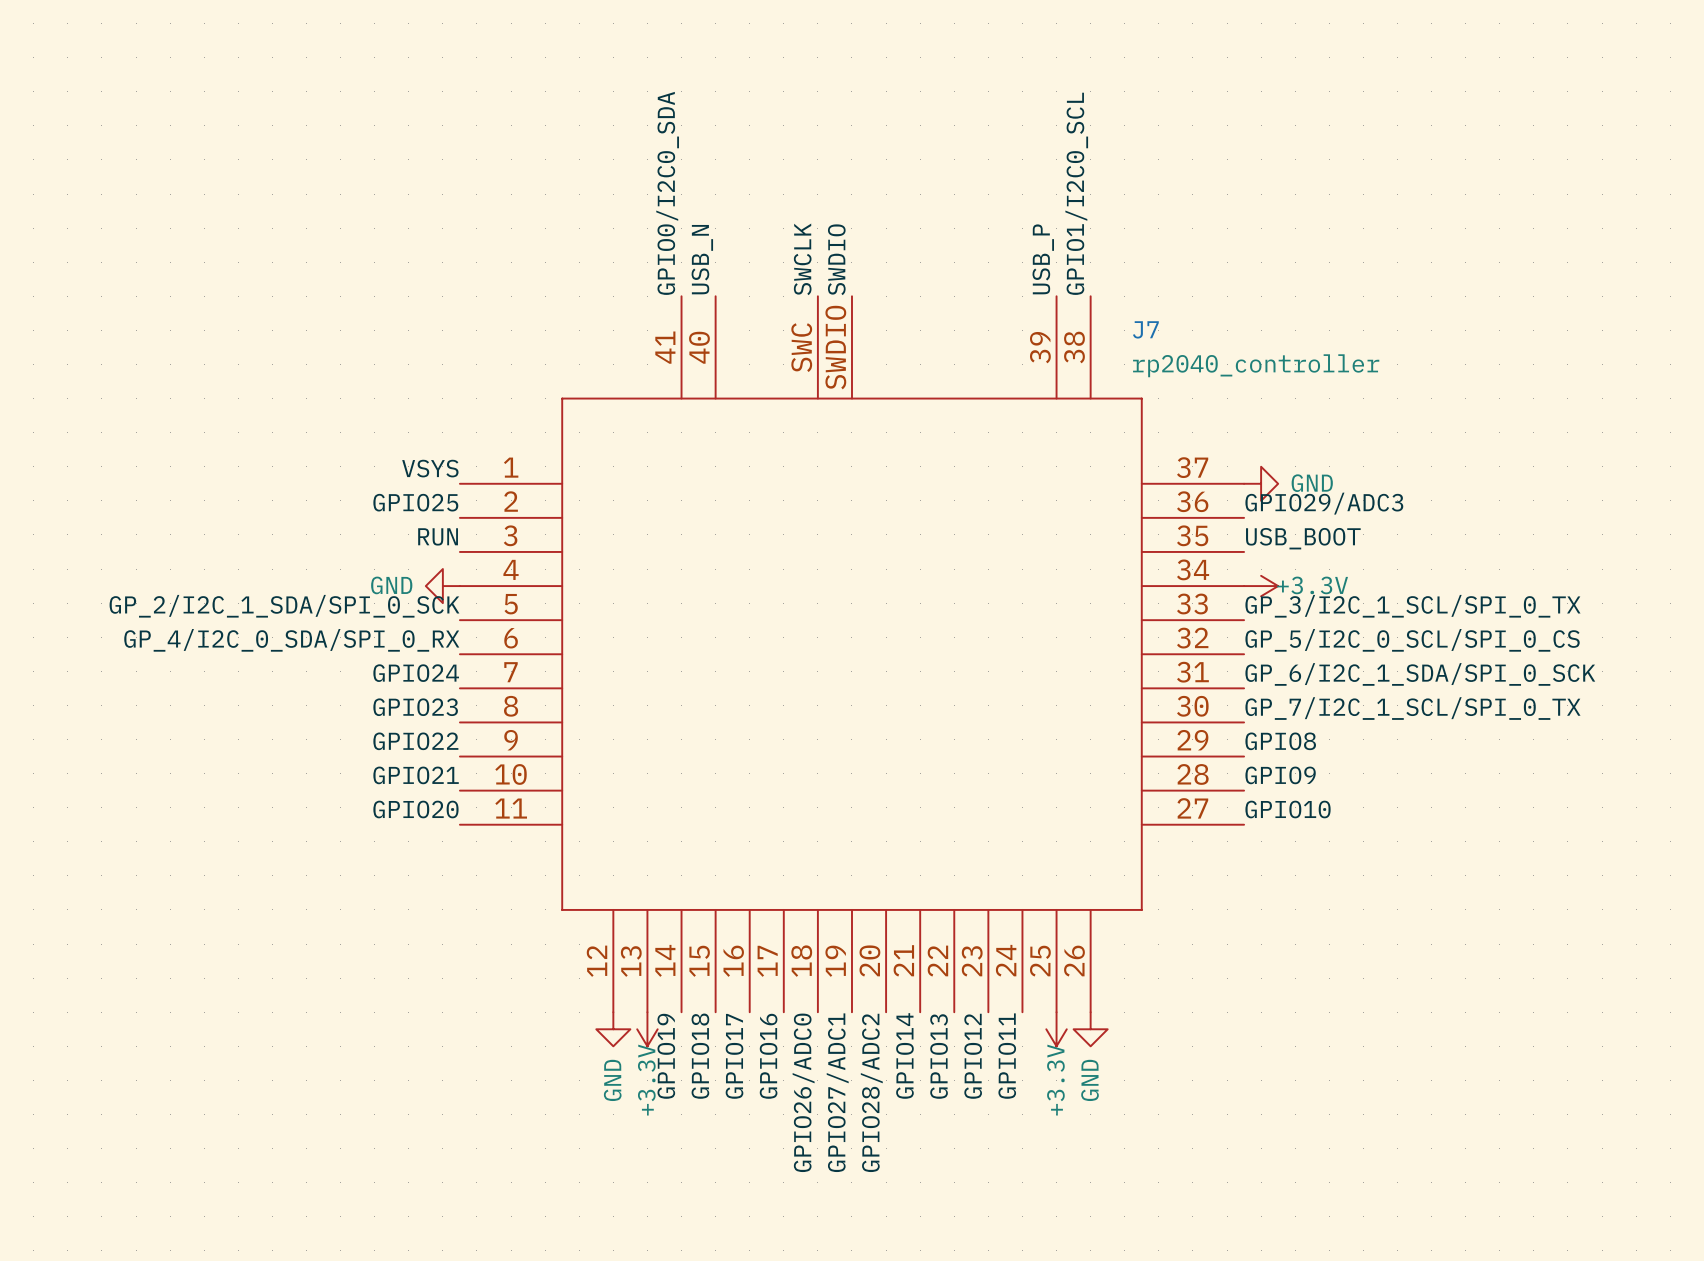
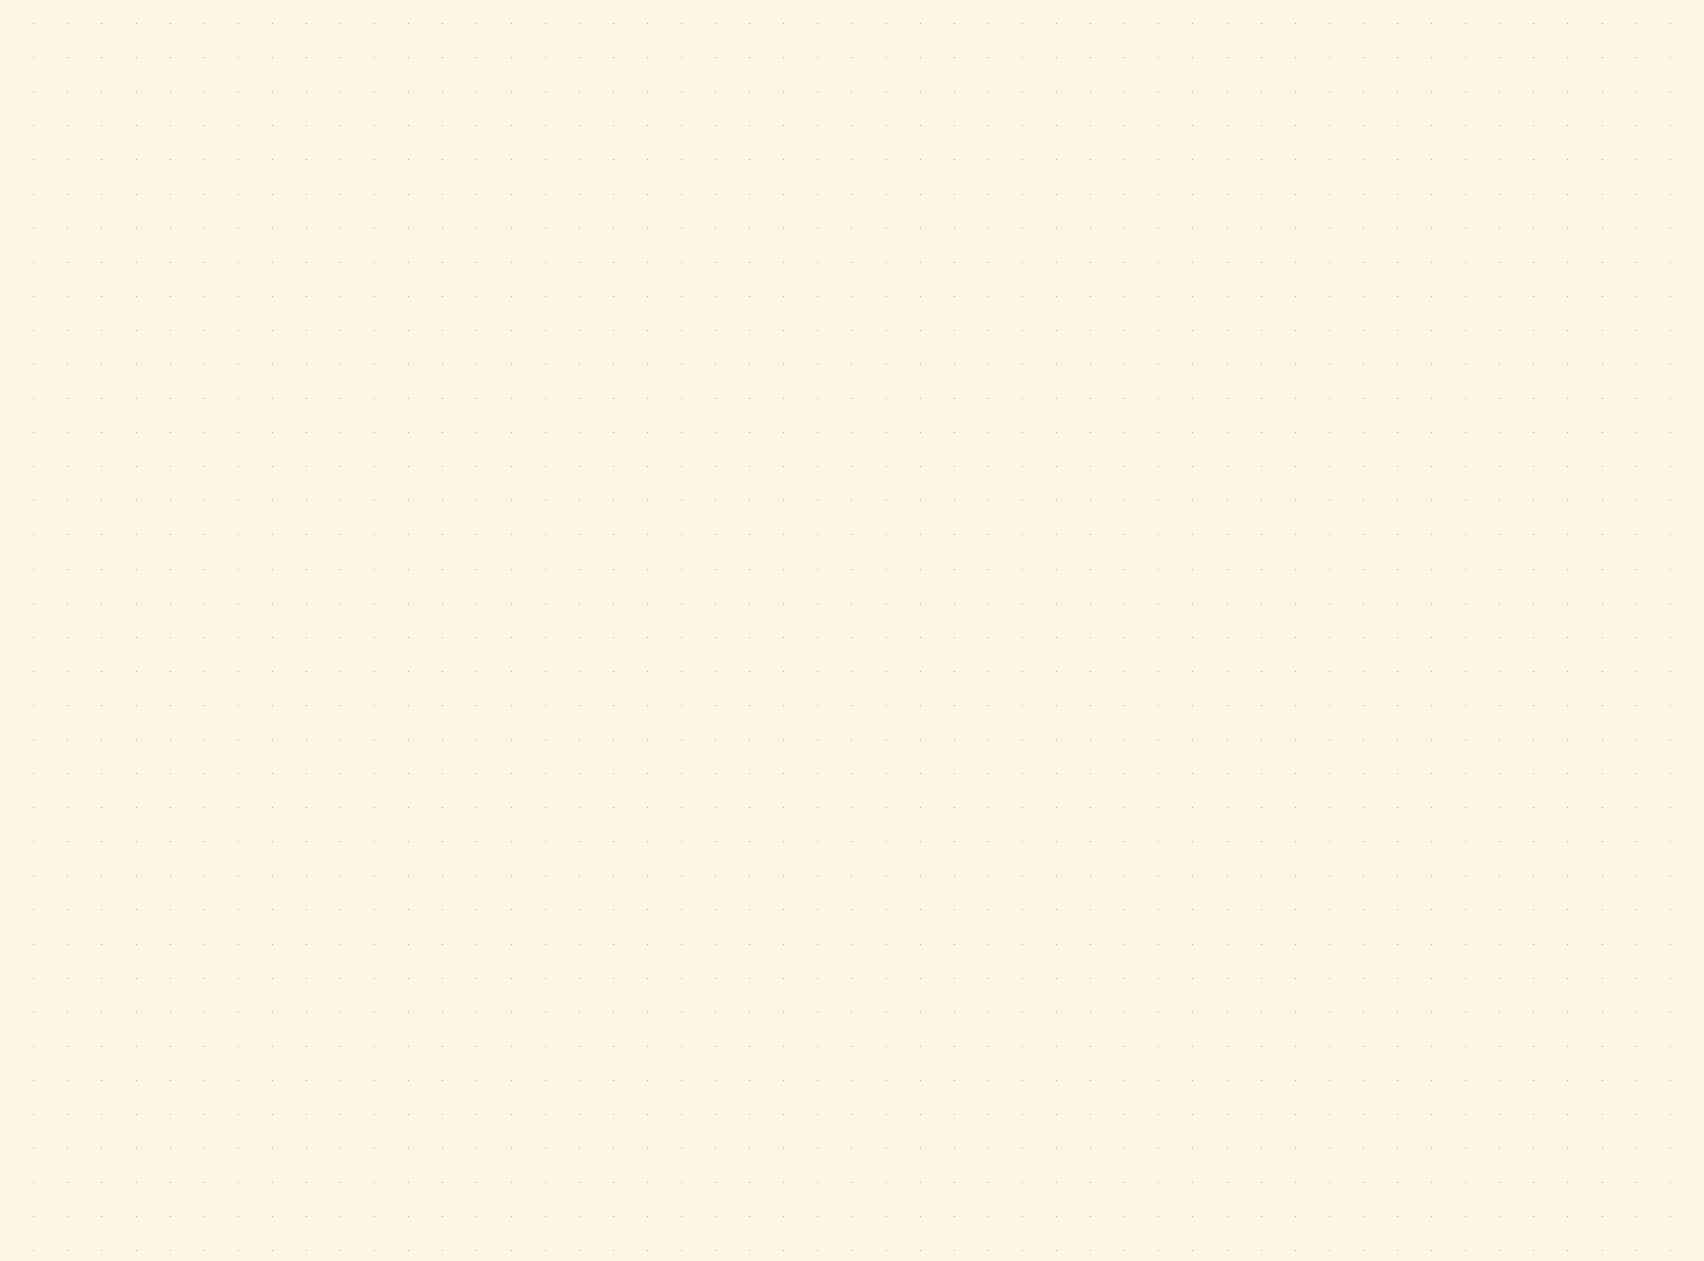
label: GPIO0/I2C0_SDA (667, 193) -> none
label: GPIO1/I2C0_SCL (1076, 193) -> none
label: USB_N (702, 259) -> none
label: SWCLK (802, 259) -> none
label: SWDIO (836, 259) -> none
label: USB_P (1043, 259) -> none
label: VSYS (430, 468) -> none
power symbol: GND (1261, 483) -> none
label: GPIO25 (415, 502) -> none
label: GPIO29/ADC3 (1324, 503) -> none
label: RUN (438, 536) -> none
label: USB_BOOT (1303, 538) -> none
power symbol: GND (442, 586) -> none
power symbol: +3.3V (1261, 586) -> none
label: GP_2/I2C_1_SDA/SPI_0_SCK (284, 606) -> none
label: GP_3/I2C_1_SCL/SPI_0_TX (1412, 606) -> none
label: GP_4/I2C_0_SDA/SPI_0_RX (291, 640) -> none
label: GP_5/I2C_0_SCL/SPI_0_CS (1412, 640) -> none
J7: rp2040_controller (851, 654) -> none
label: GPIO24 (416, 673) -> none
label: GP_6/I2C_1_SDA/SPI_0_SCK (1420, 674) -> none
label: GPIO23 (415, 707) -> none
label: GP_7/I2C_1_SCL/SPI_0_TX (1412, 708) -> none
label: GPIO22 (415, 741) -> none
label: GPIO8 (1280, 741) -> none
label: GPIO21 (416, 775) -> none
label: GPIO9 (1280, 775) -> none
label: GPIO20 (415, 809) -> none
label: GPIO10 (1288, 809) -> none
power symbol: GND (613, 1029) -> none
power symbol: +3.3V (647, 1029) -> none
power symbol: +3.3V (1056, 1029) -> none
power symbol: GND (1090, 1029) -> none
label: GPIO14 (904, 1055) -> none
label: GPIO19 (666, 1056) -> none
label: GPIO18 (700, 1056) -> none
label: GPIO17 (734, 1056) -> none
label: GPIO16 (768, 1056) -> none
label: GPIO13 (939, 1056) -> none
label: GPIO12 (973, 1056) -> none
label: GPIO11 (1007, 1056) -> none
label: GPIO26/ADC0 (803, 1092) -> none
label: GPIO27/ADC1 (837, 1092) -> none
label: GPIO28/ADC2 (871, 1092) -> none

